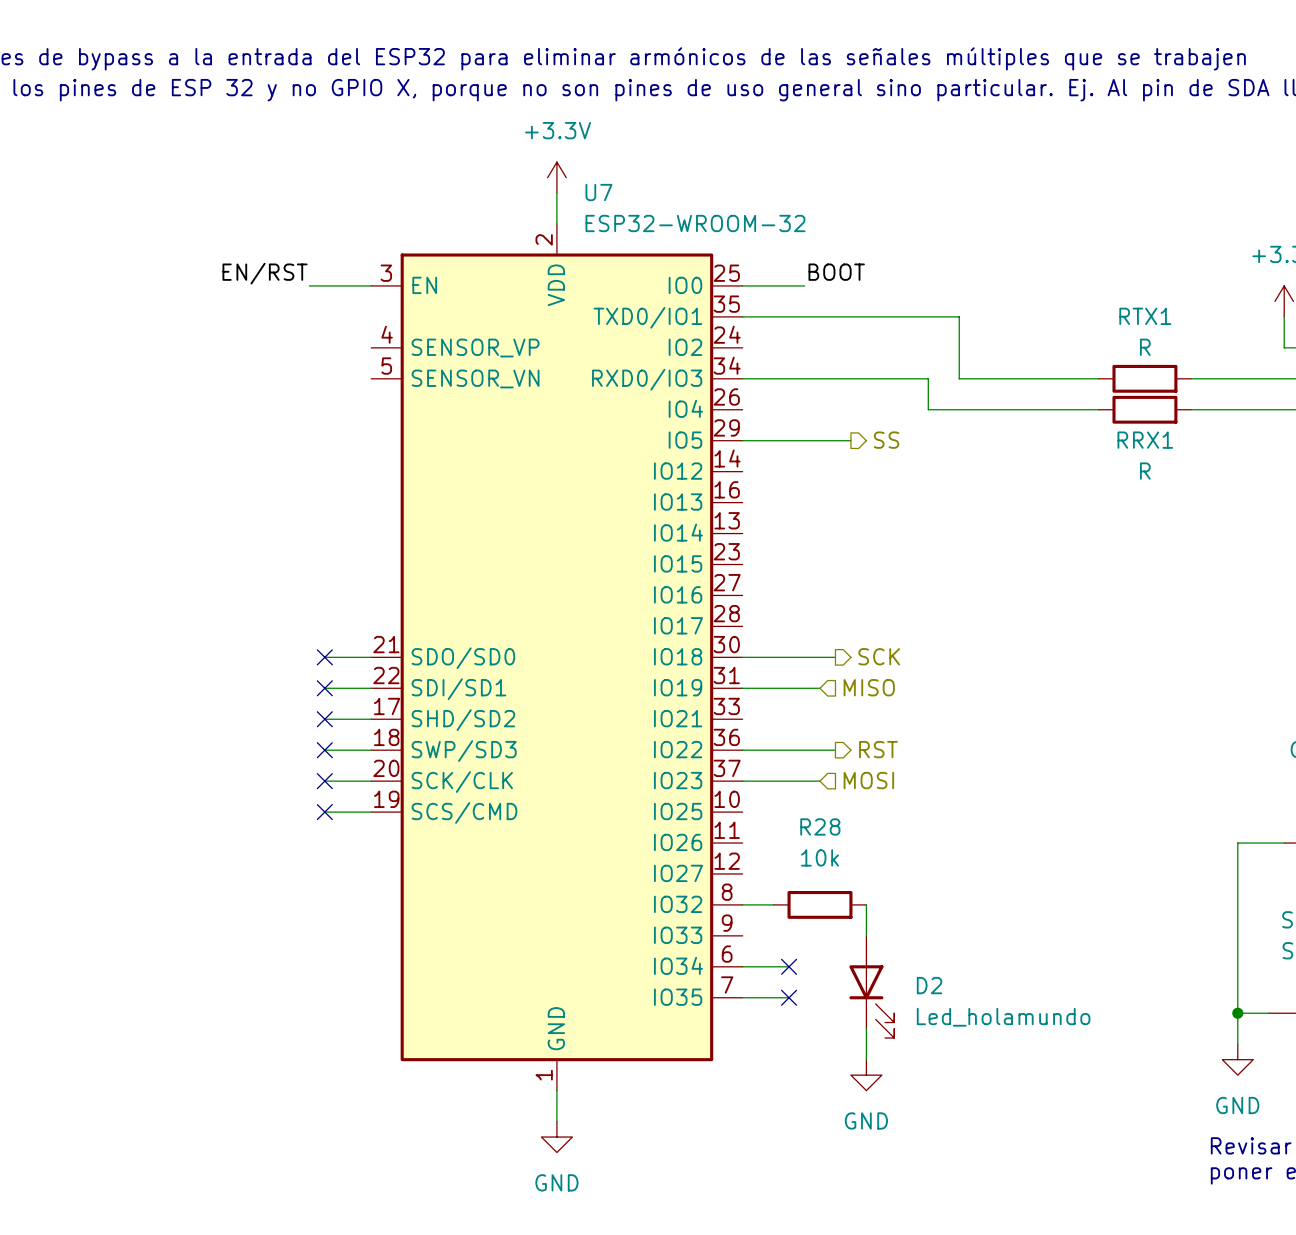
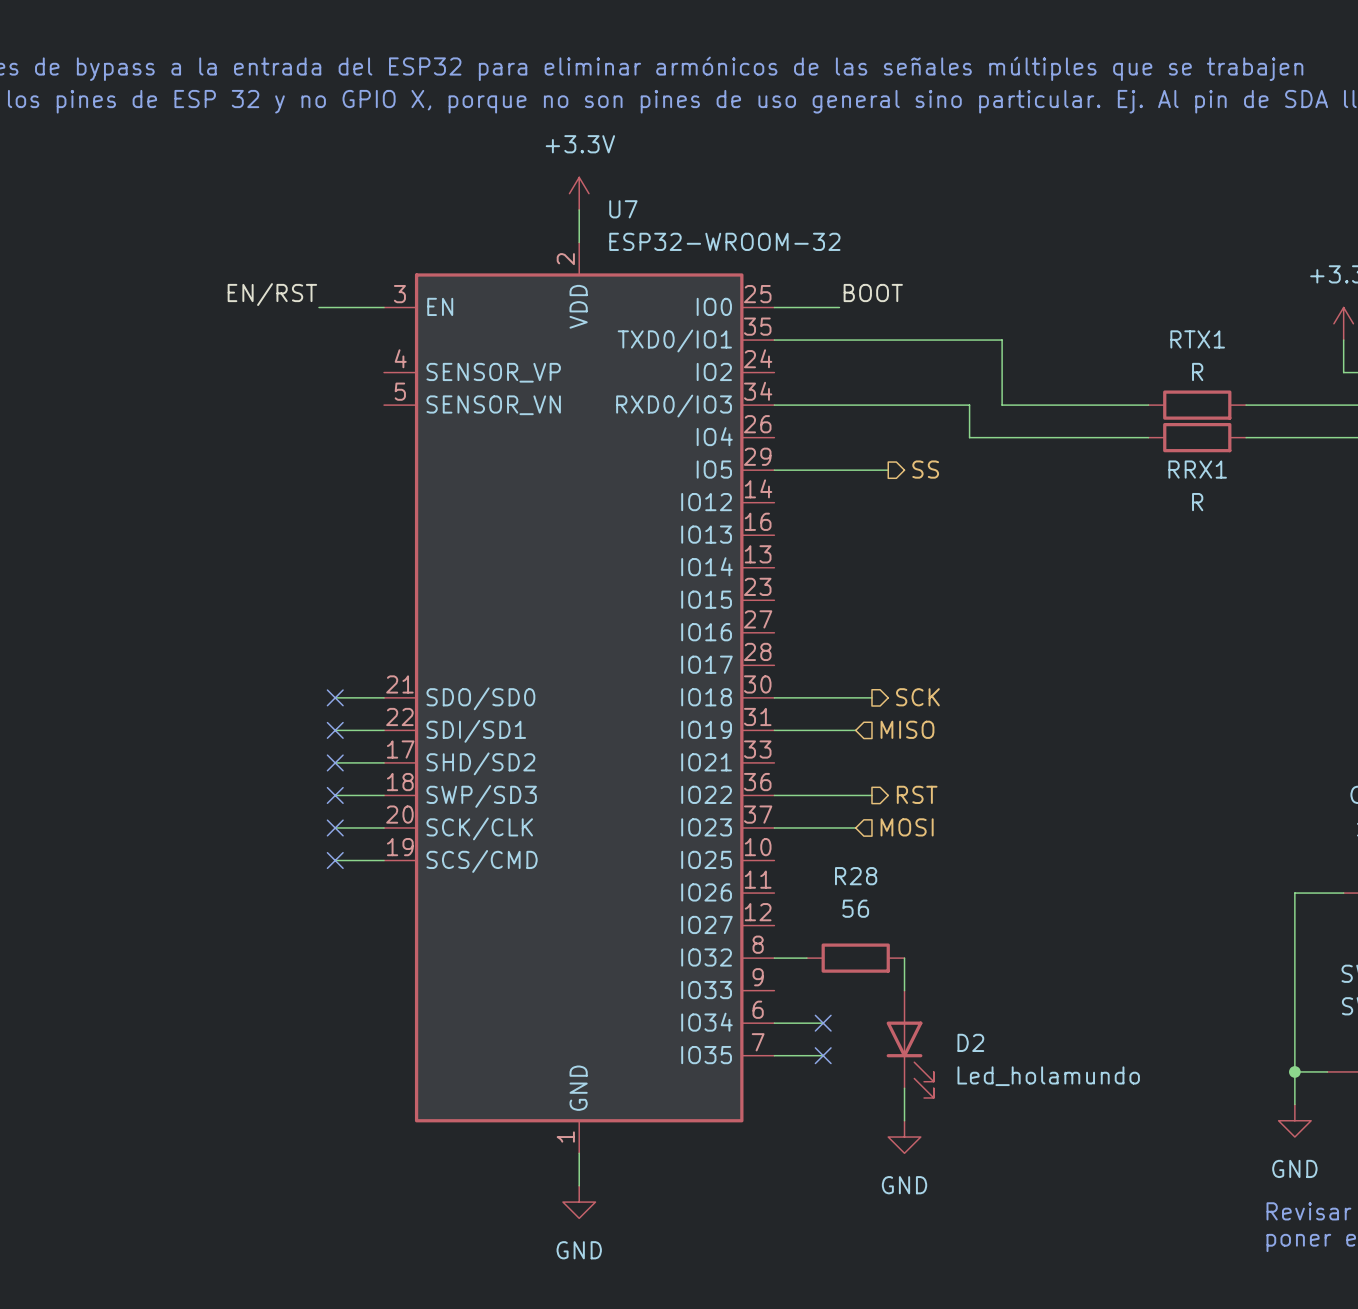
R28 value: 10k (819, 857) -> 56 (855, 908)

